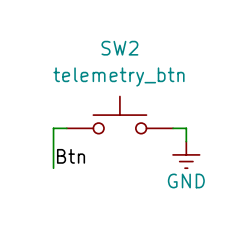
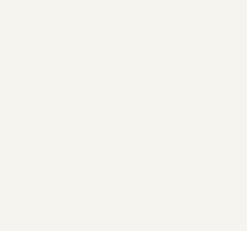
SW2: telemetry_btn (119, 115) -> none
wire: (66, 128) (53, 128) (53, 168) -> none
wire: (173, 128) (186, 128) (186, 141) -> none
power symbol: GND (186, 154) -> none
label: Btn (71, 156) -> none

